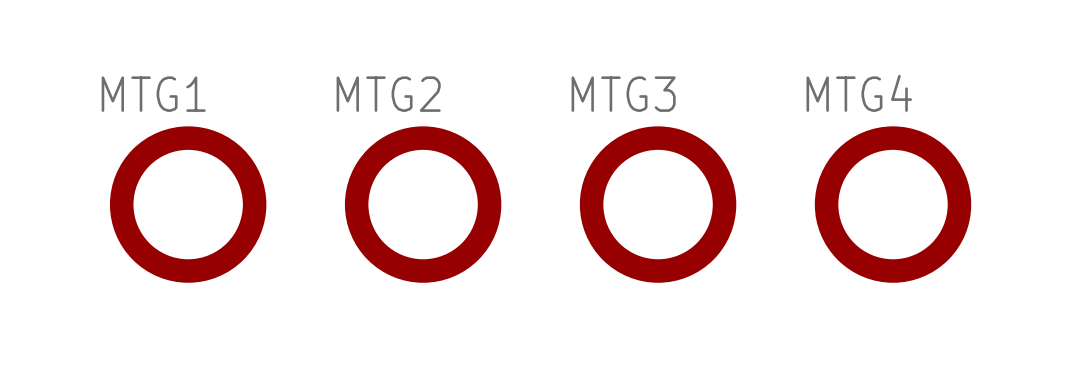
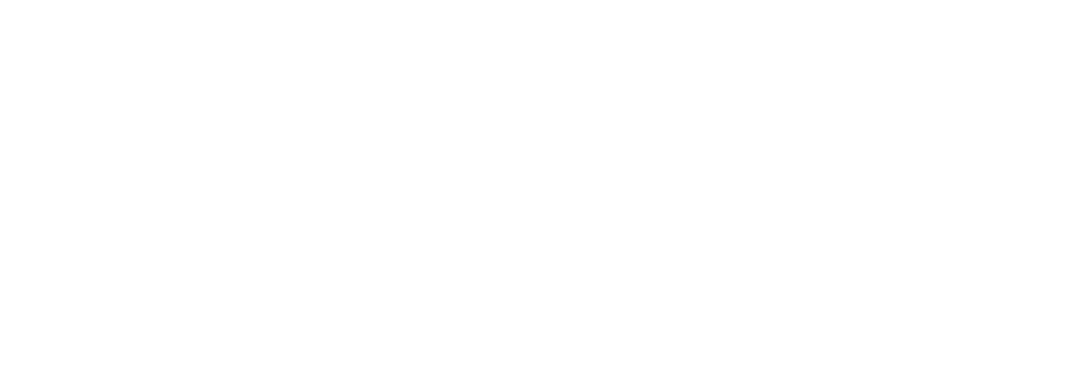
MTG1: (188, 204) -> none
MTG2: (423, 204) -> none
MTG3: (658, 204) -> none
MTG4: (893, 204) -> none

